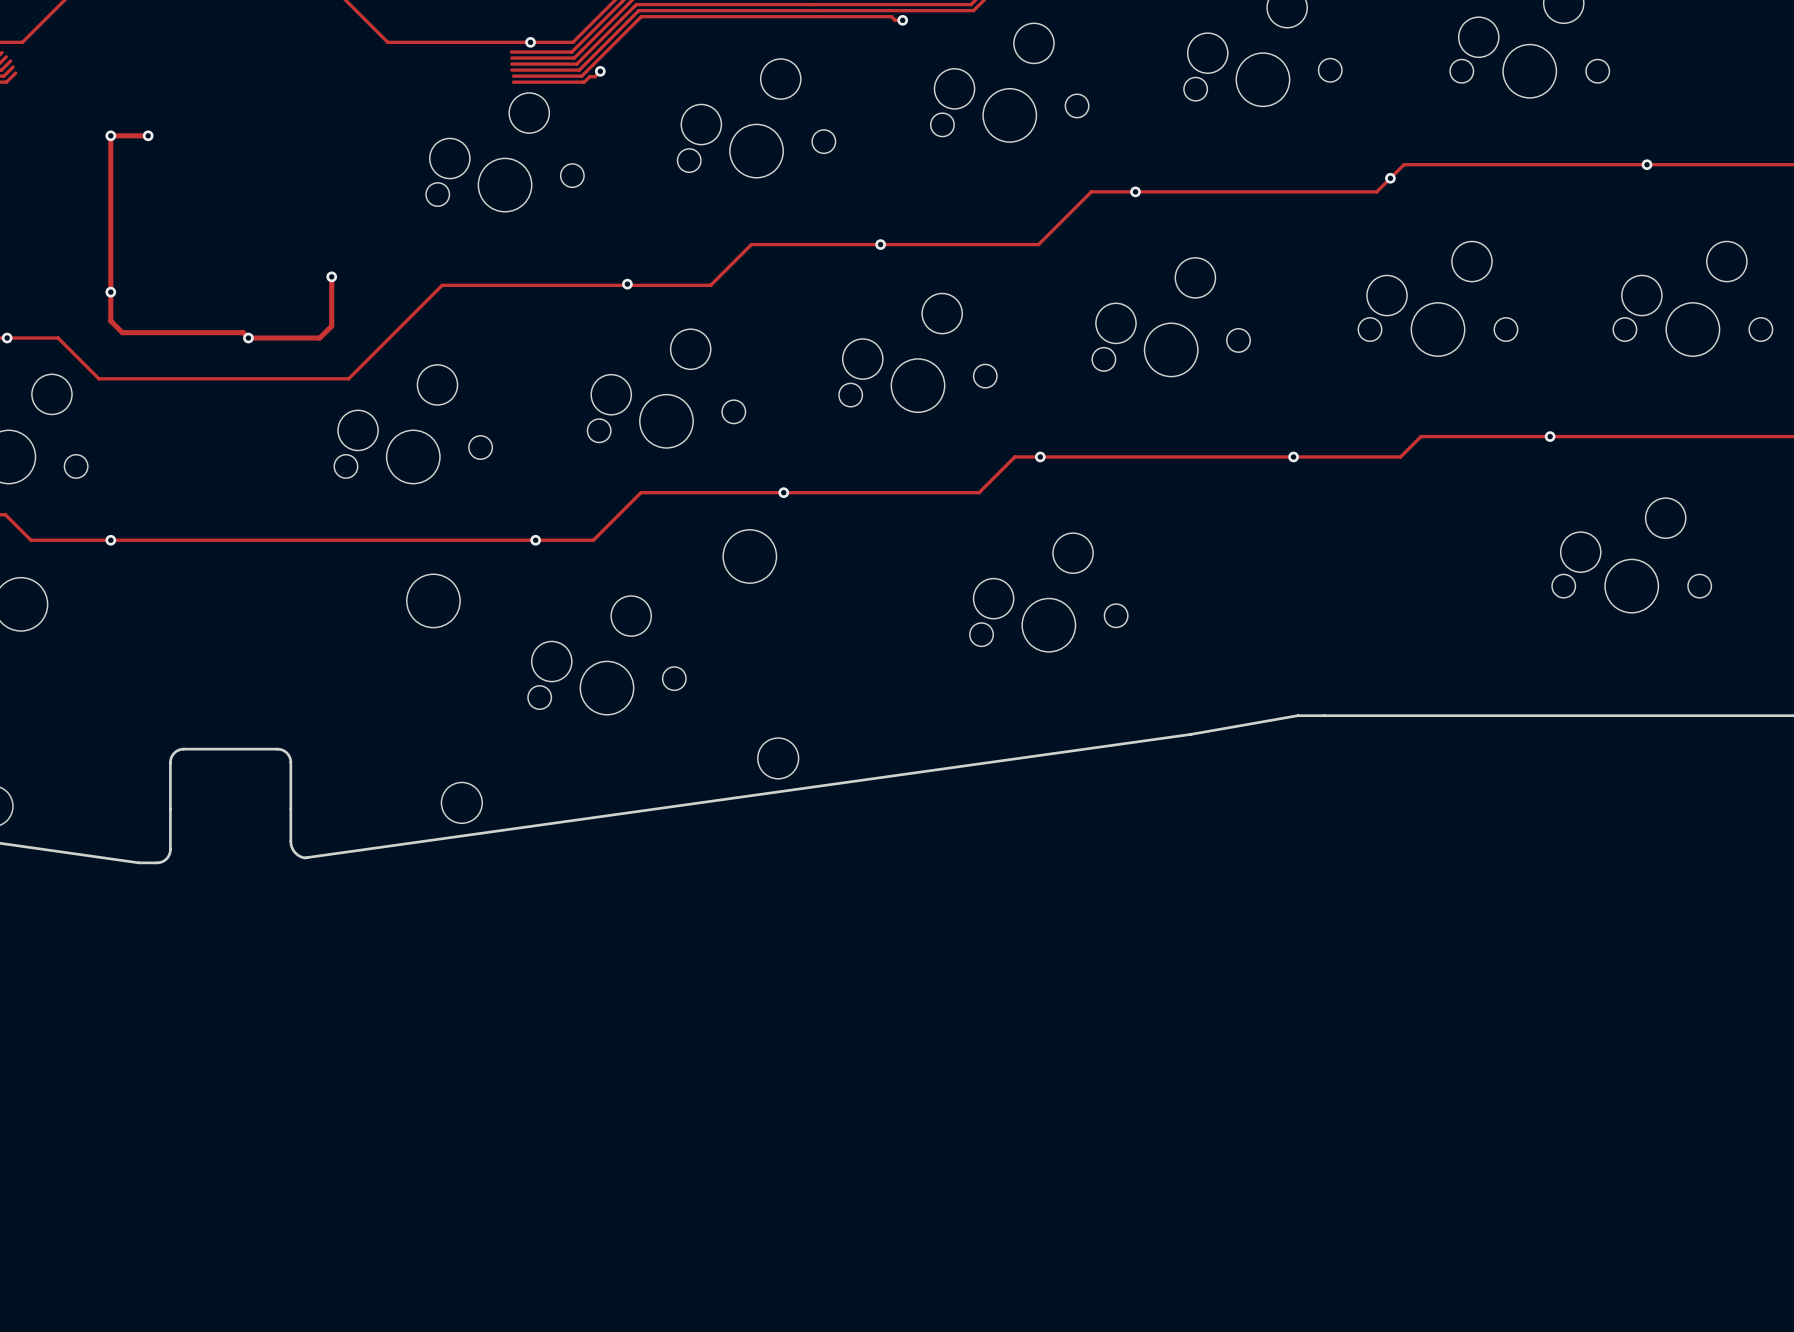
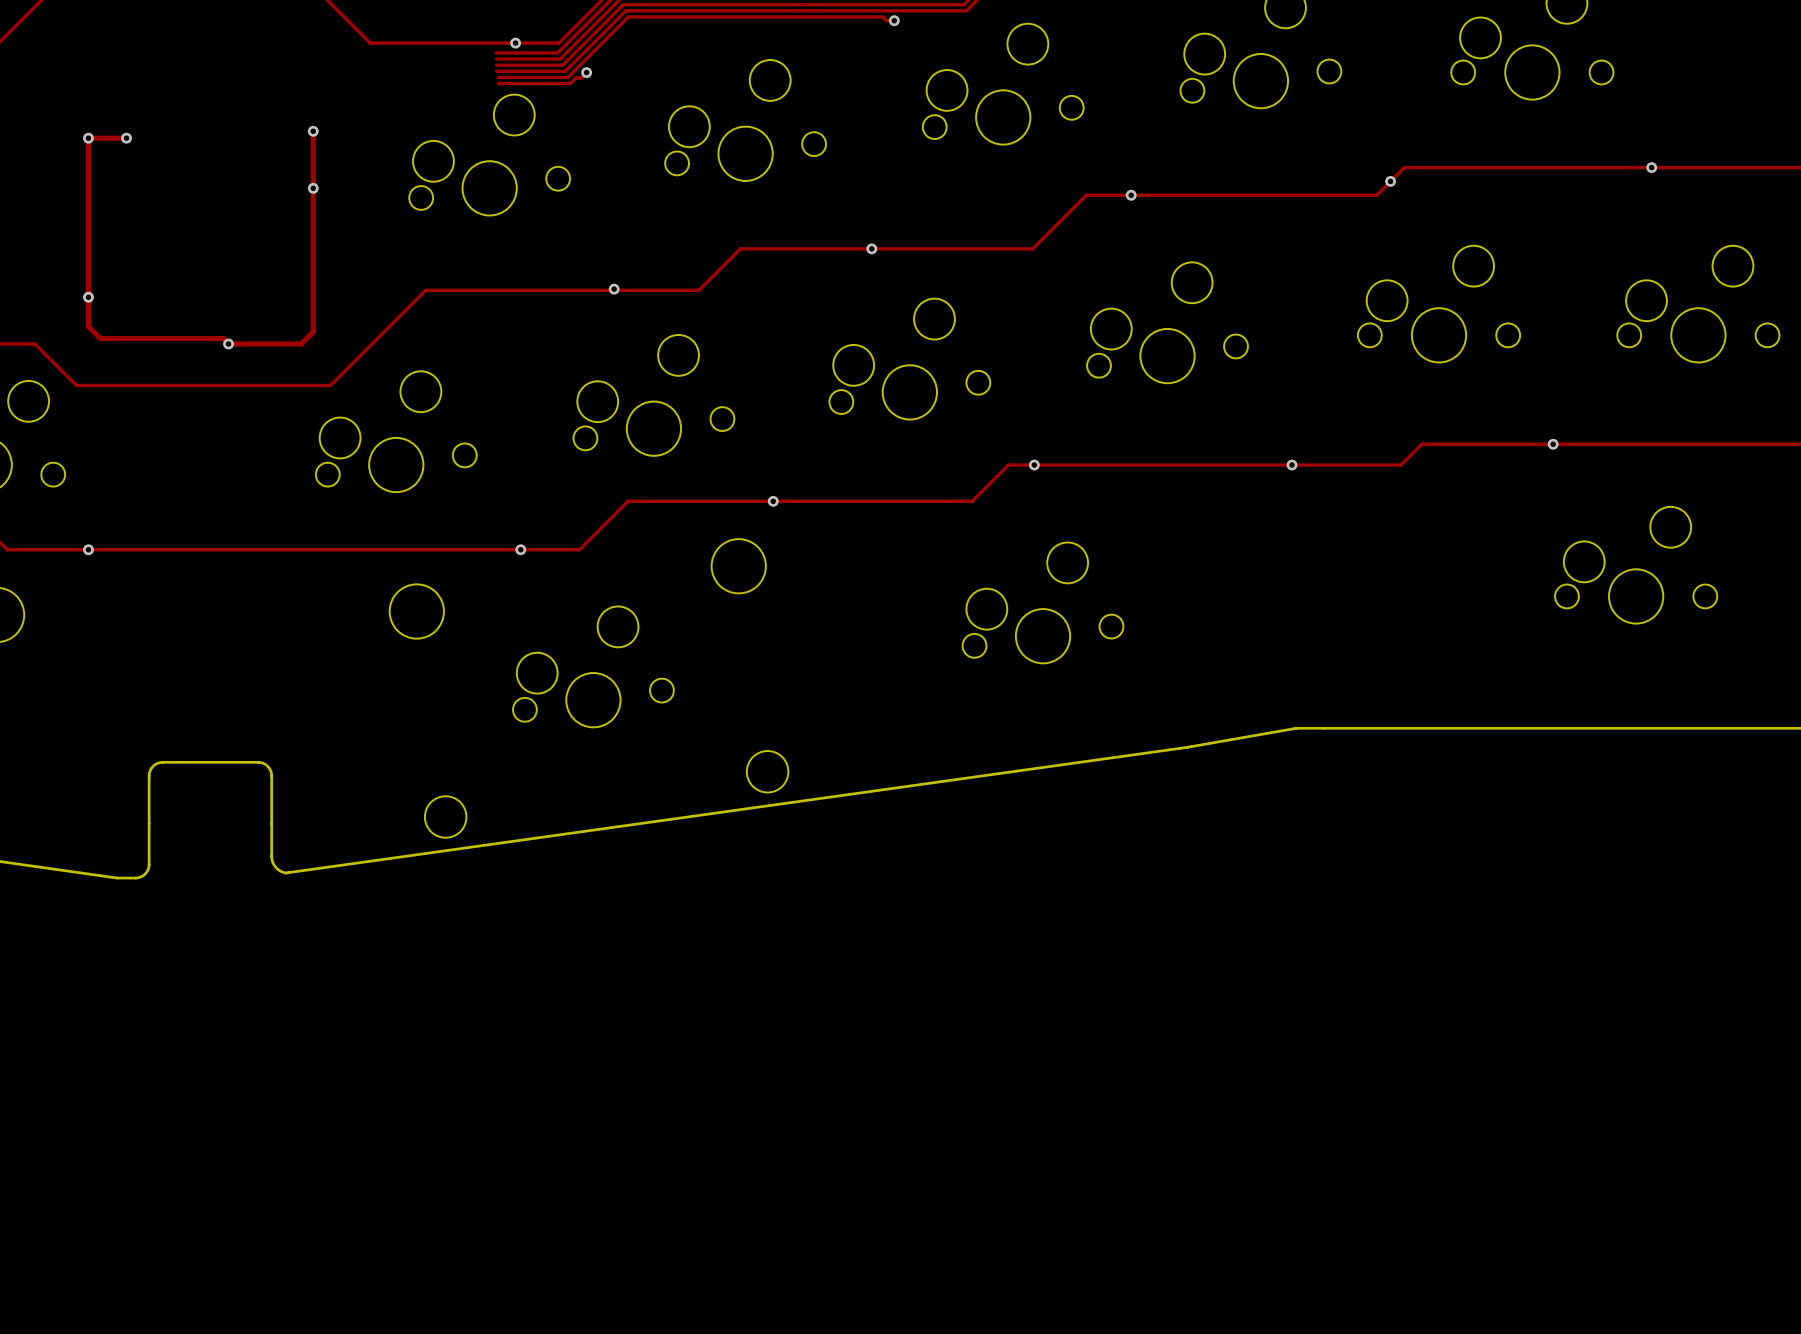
track: none -> (313, 131) (313, 281)
via: none -> (313, 131)
via: none -> (313, 188)
via: (331, 276) -> none

